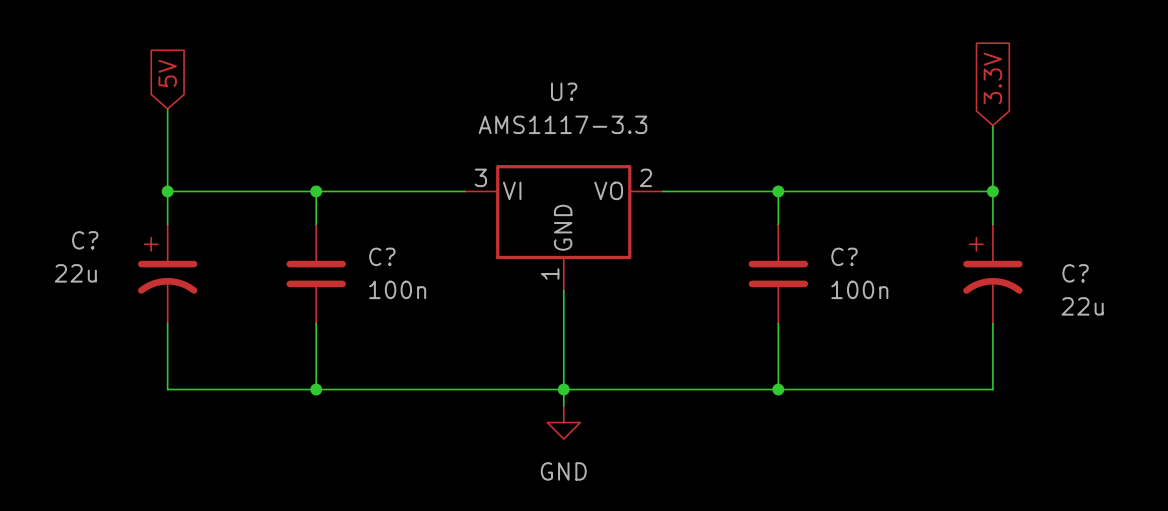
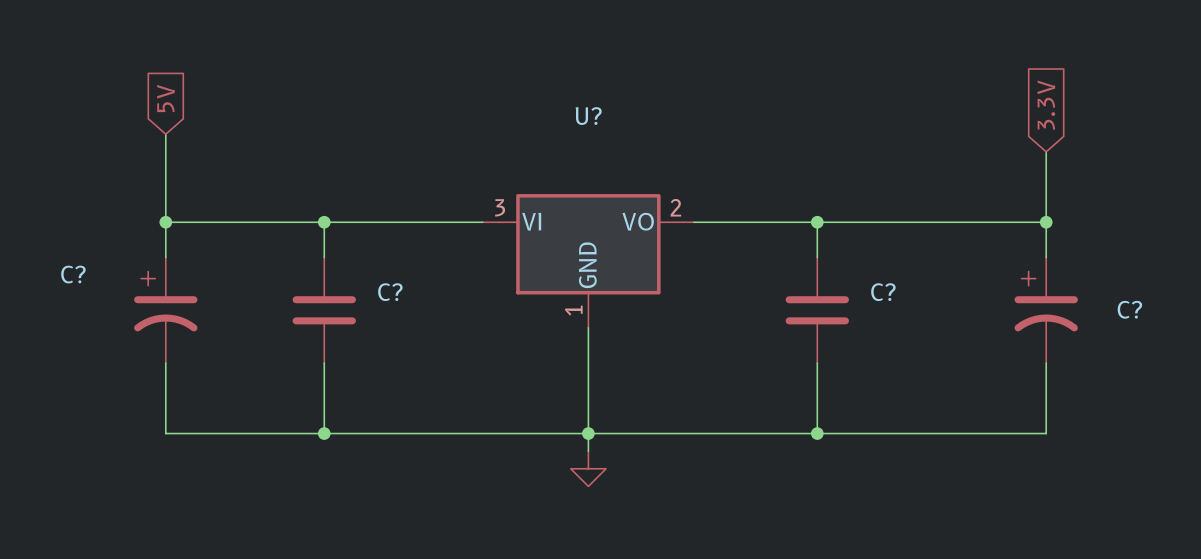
U? value: AMS1117-3.3 (562, 124) -> none
C? value: 22u (75, 273) -> none
C? value: 100n (397, 289) -> none
C? value: 100n (859, 289) -> none
C? value: 22u (1082, 306) -> none
power symbol text: GND (563, 471) -> none

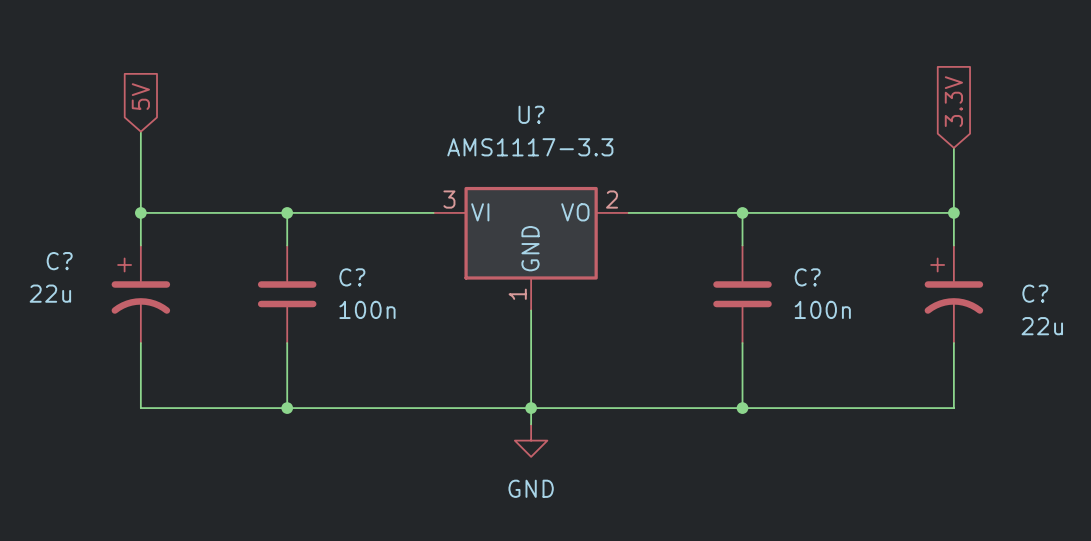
U? value: none -> AMS1117-3.3 (530, 147)
C? value: none -> 22u (50, 293)
C? value: none -> 100n (367, 309)
C? value: none -> 100n (822, 309)
C? value: none -> 22u (1042, 326)
power symbol text: none -> GND (531, 488)

